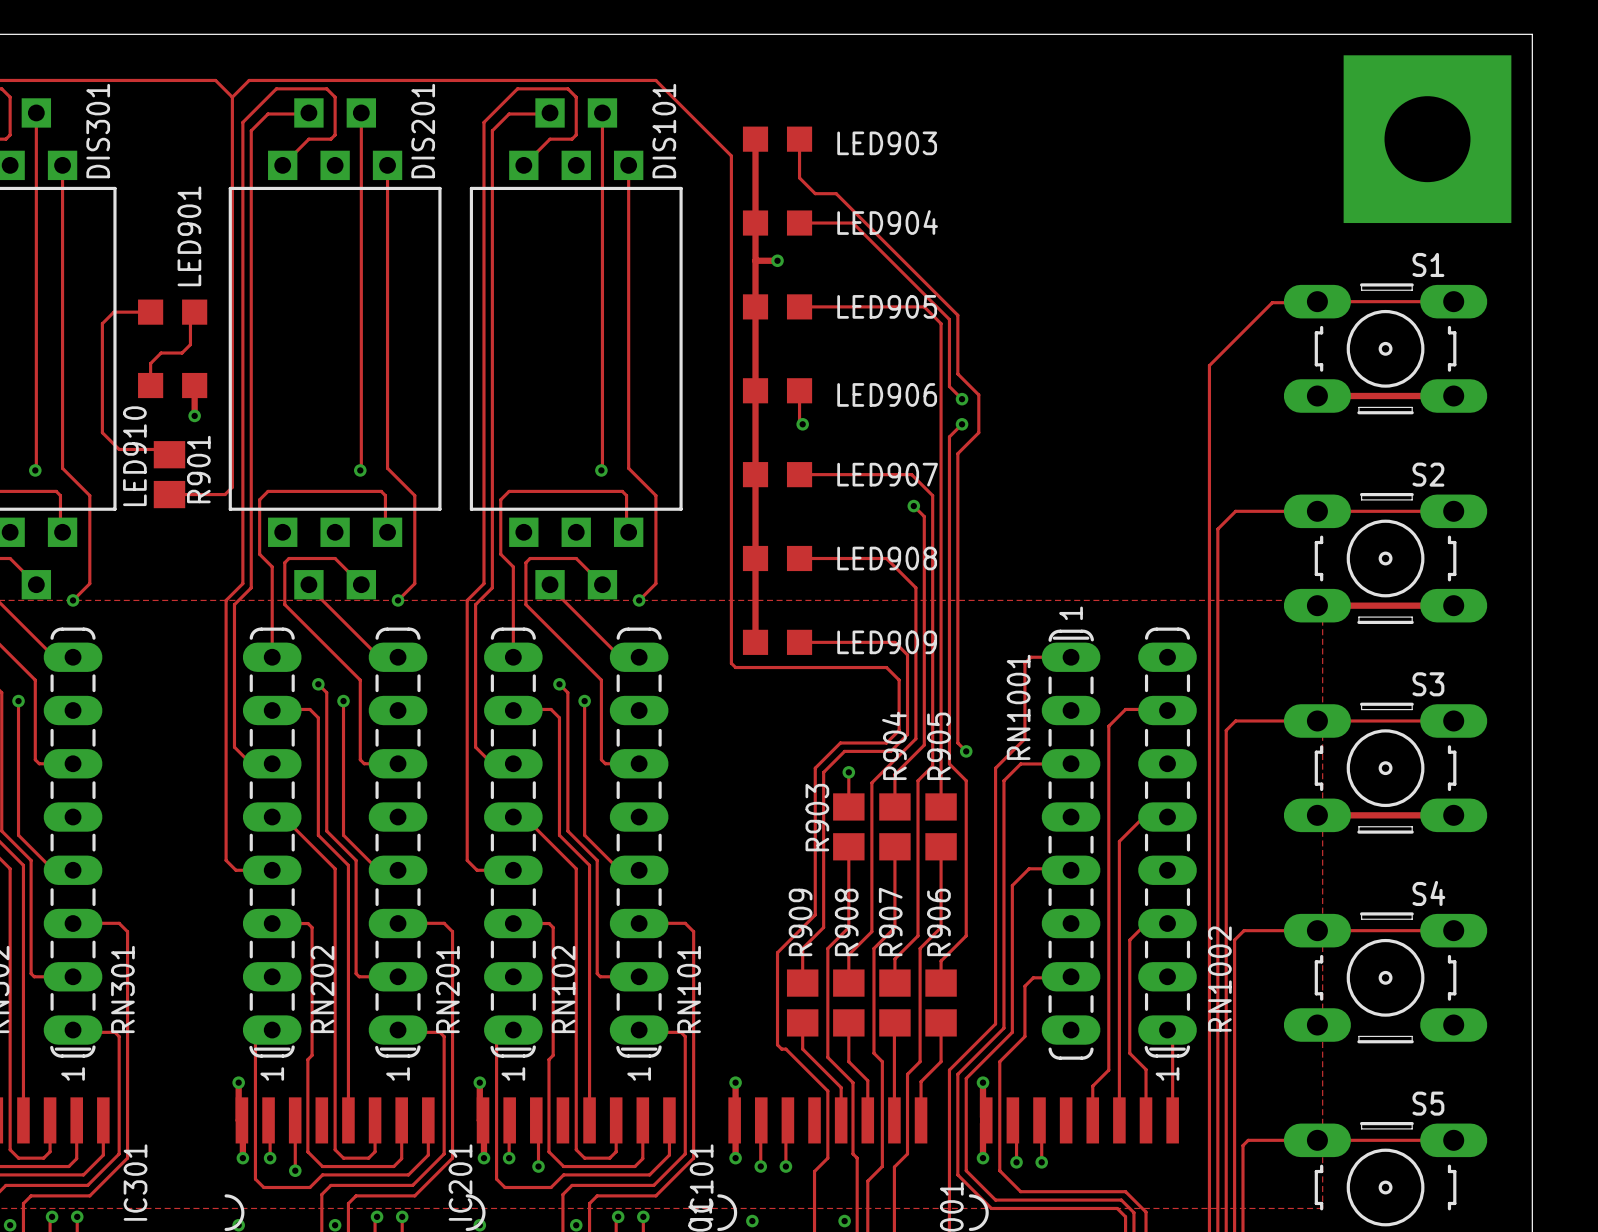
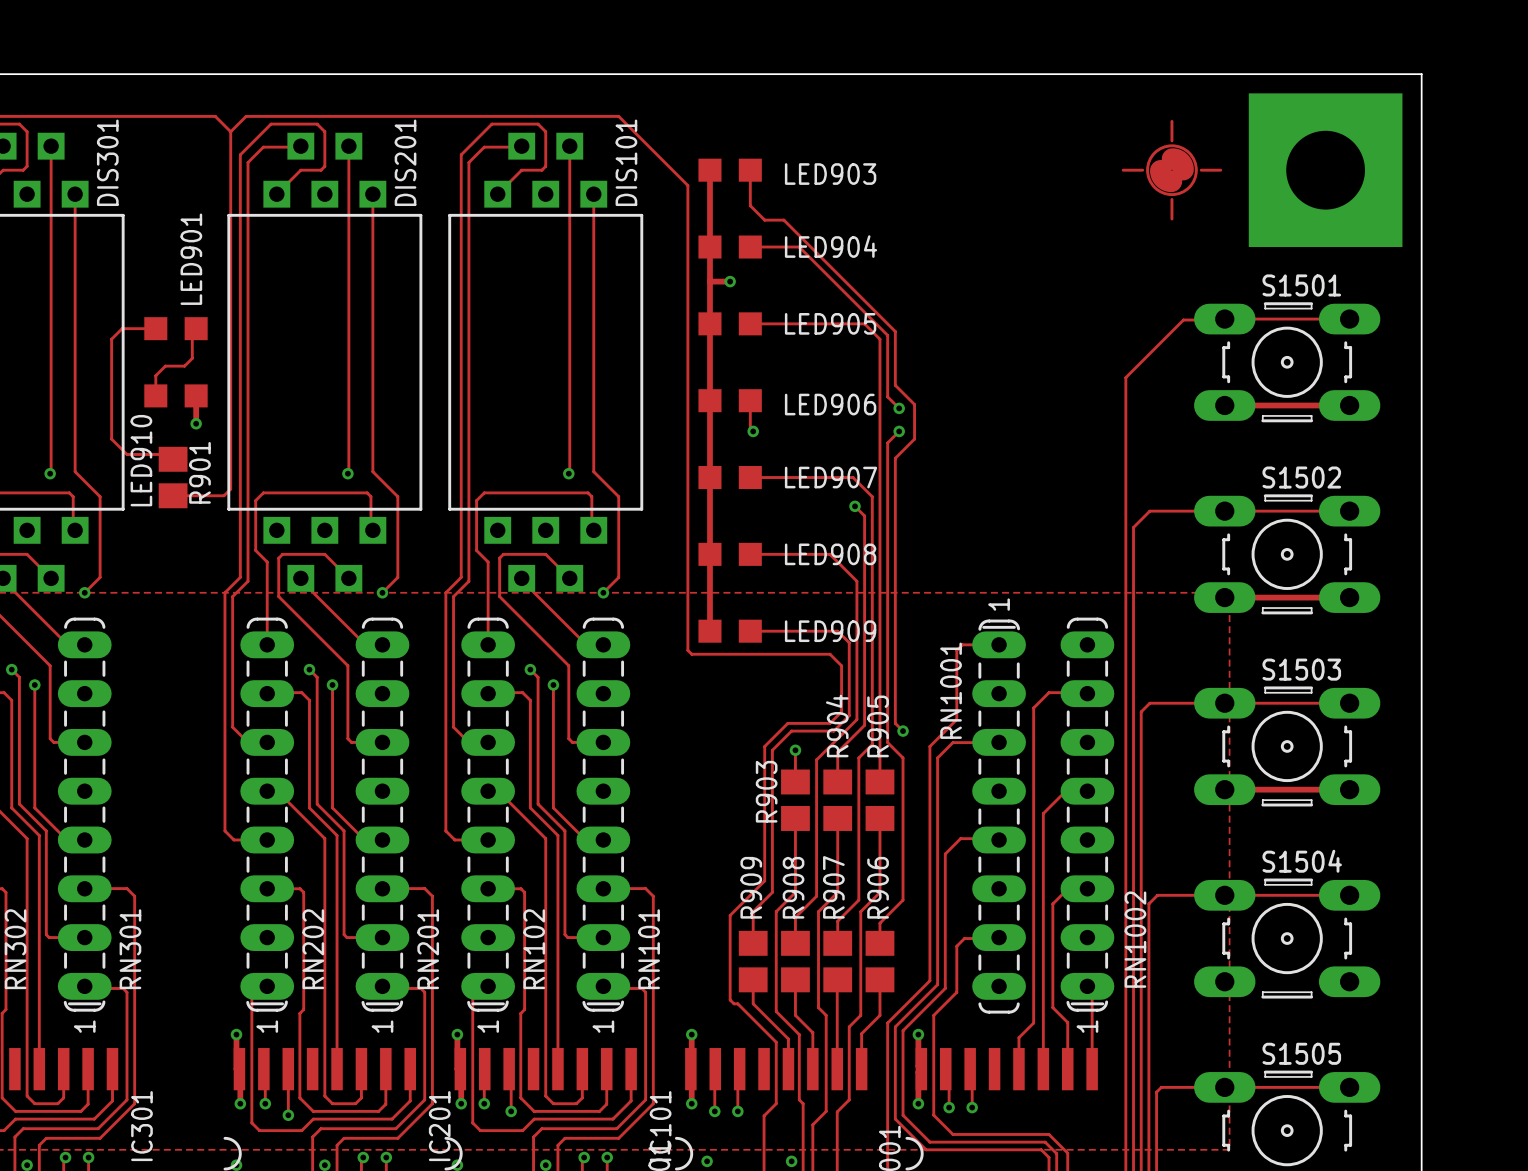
part: none -> (1171, 170)
S1 name: S1 (1428, 264) -> S1501 (1301, 285)
S2 name: S2 (1428, 474) -> S1502 (1301, 477)
S3 name: S3 (1428, 684) -> S1503 (1301, 669)
S4 name: S4 (1428, 893) -> S1504 (1302, 861)
S5 name: S5 (1428, 1103) -> S1505 (1301, 1053)

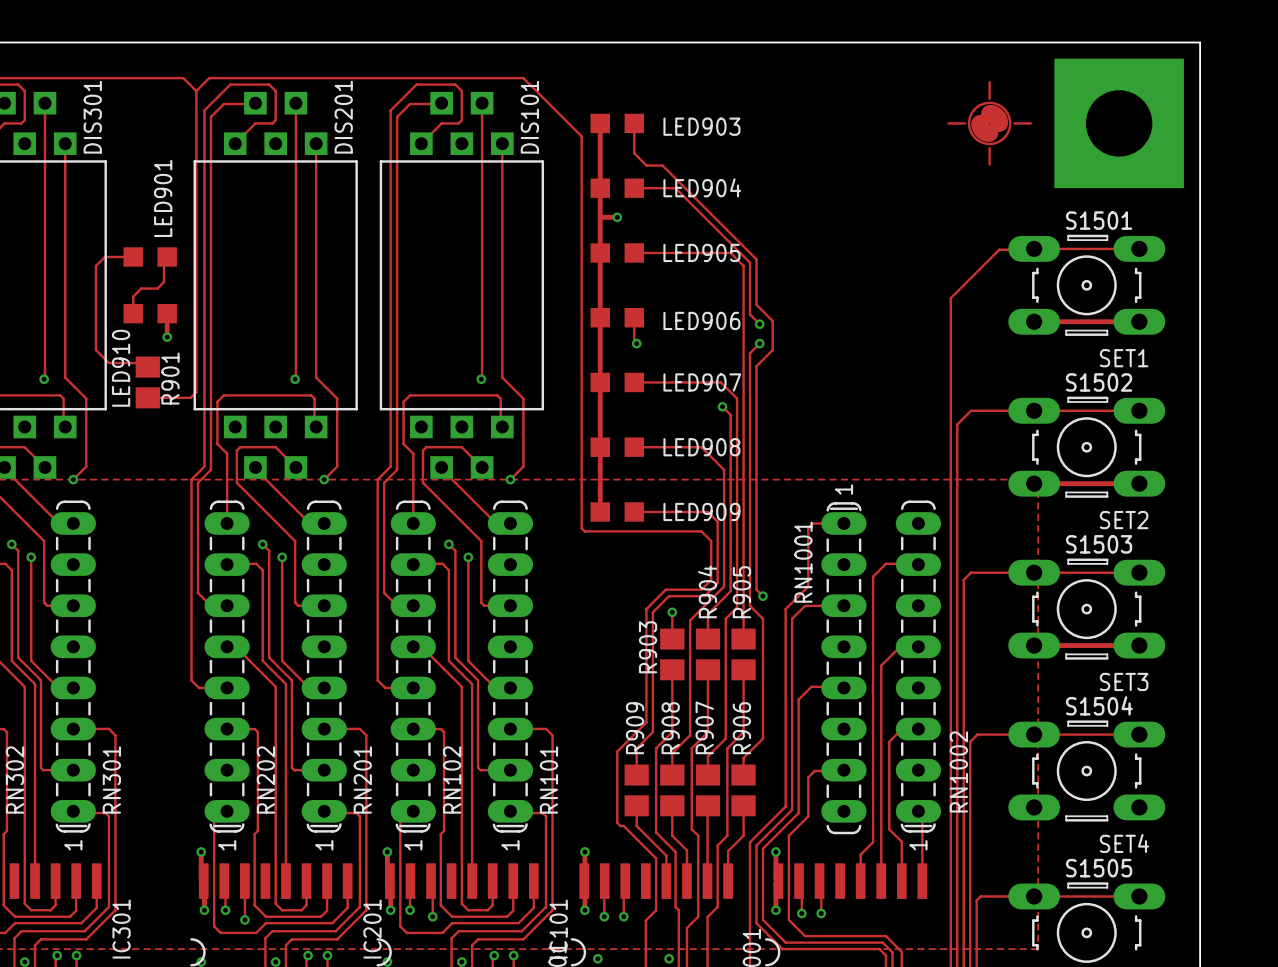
S1501 text: none -> SET1 (1124, 358)
S1502 text: none -> SET2 (1124, 520)
S1503 text: none -> SET3 (1124, 681)
S1504 text: none -> SET4 (1124, 843)

